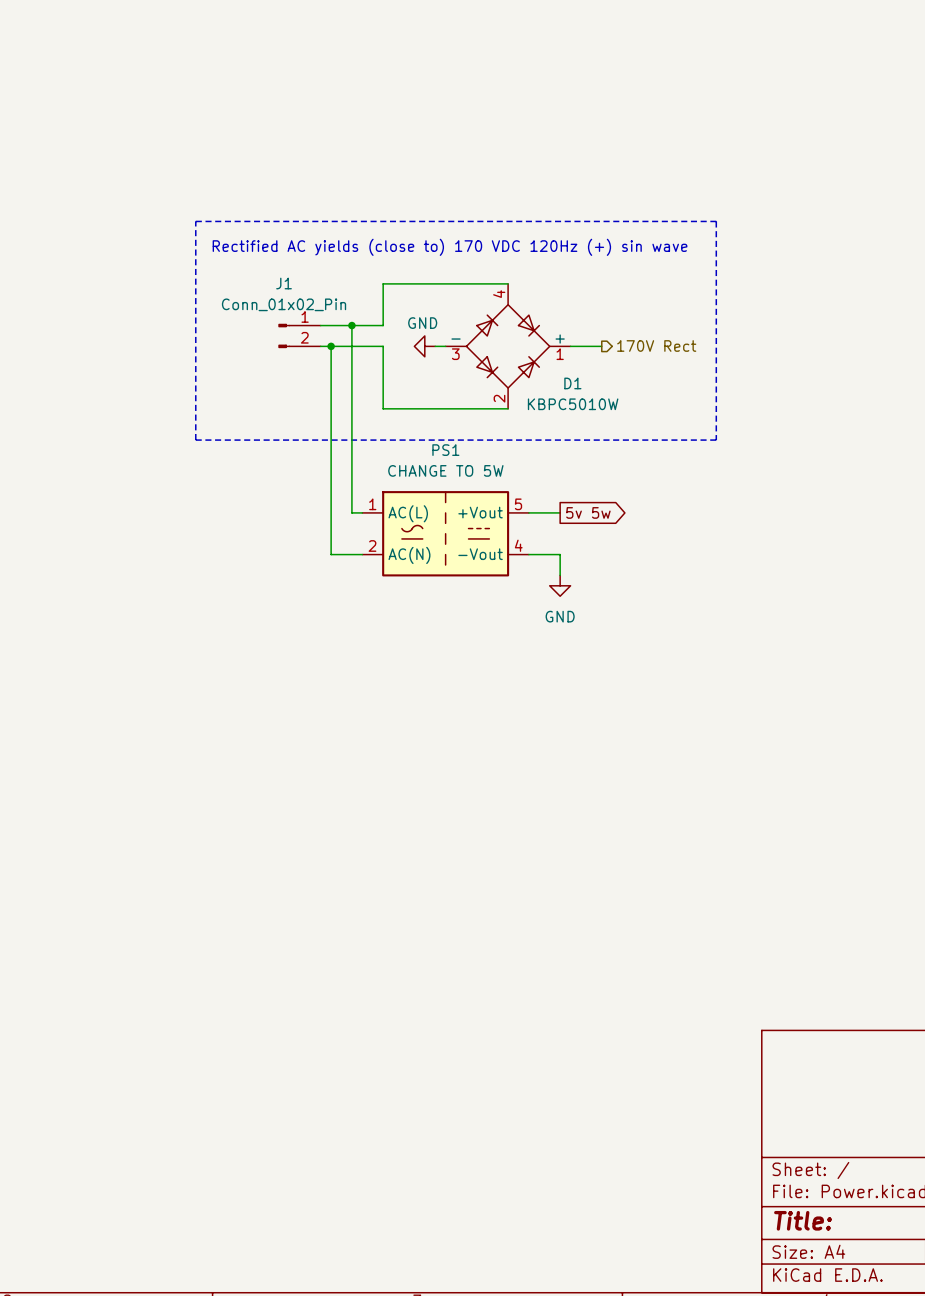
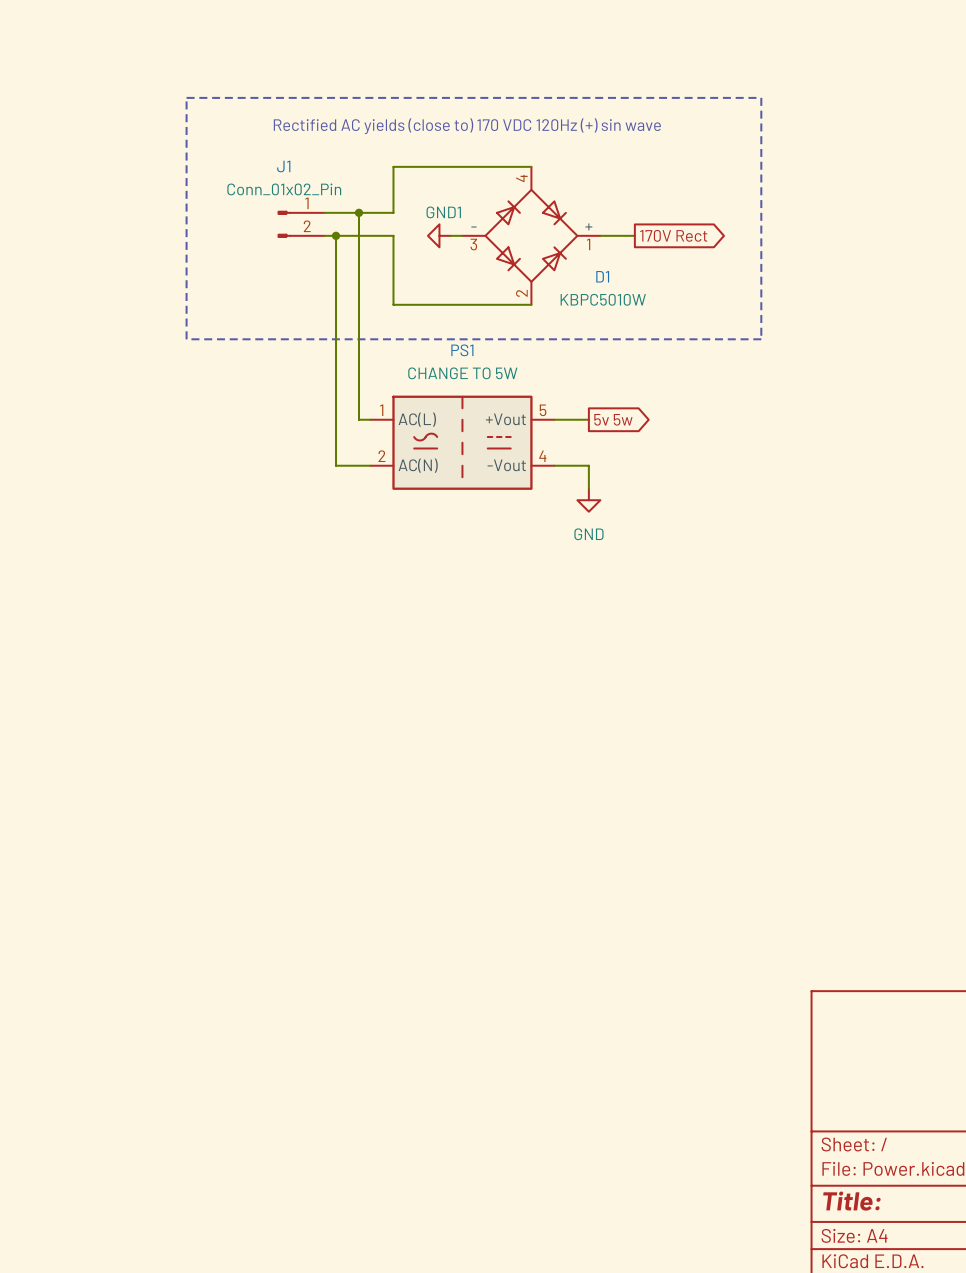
hierarchical label: 170V Rect (656, 345) -> none
power symbol: GND (424, 346) -> GND1 (439, 235)
global label: none -> 170V Rect (673, 235)

